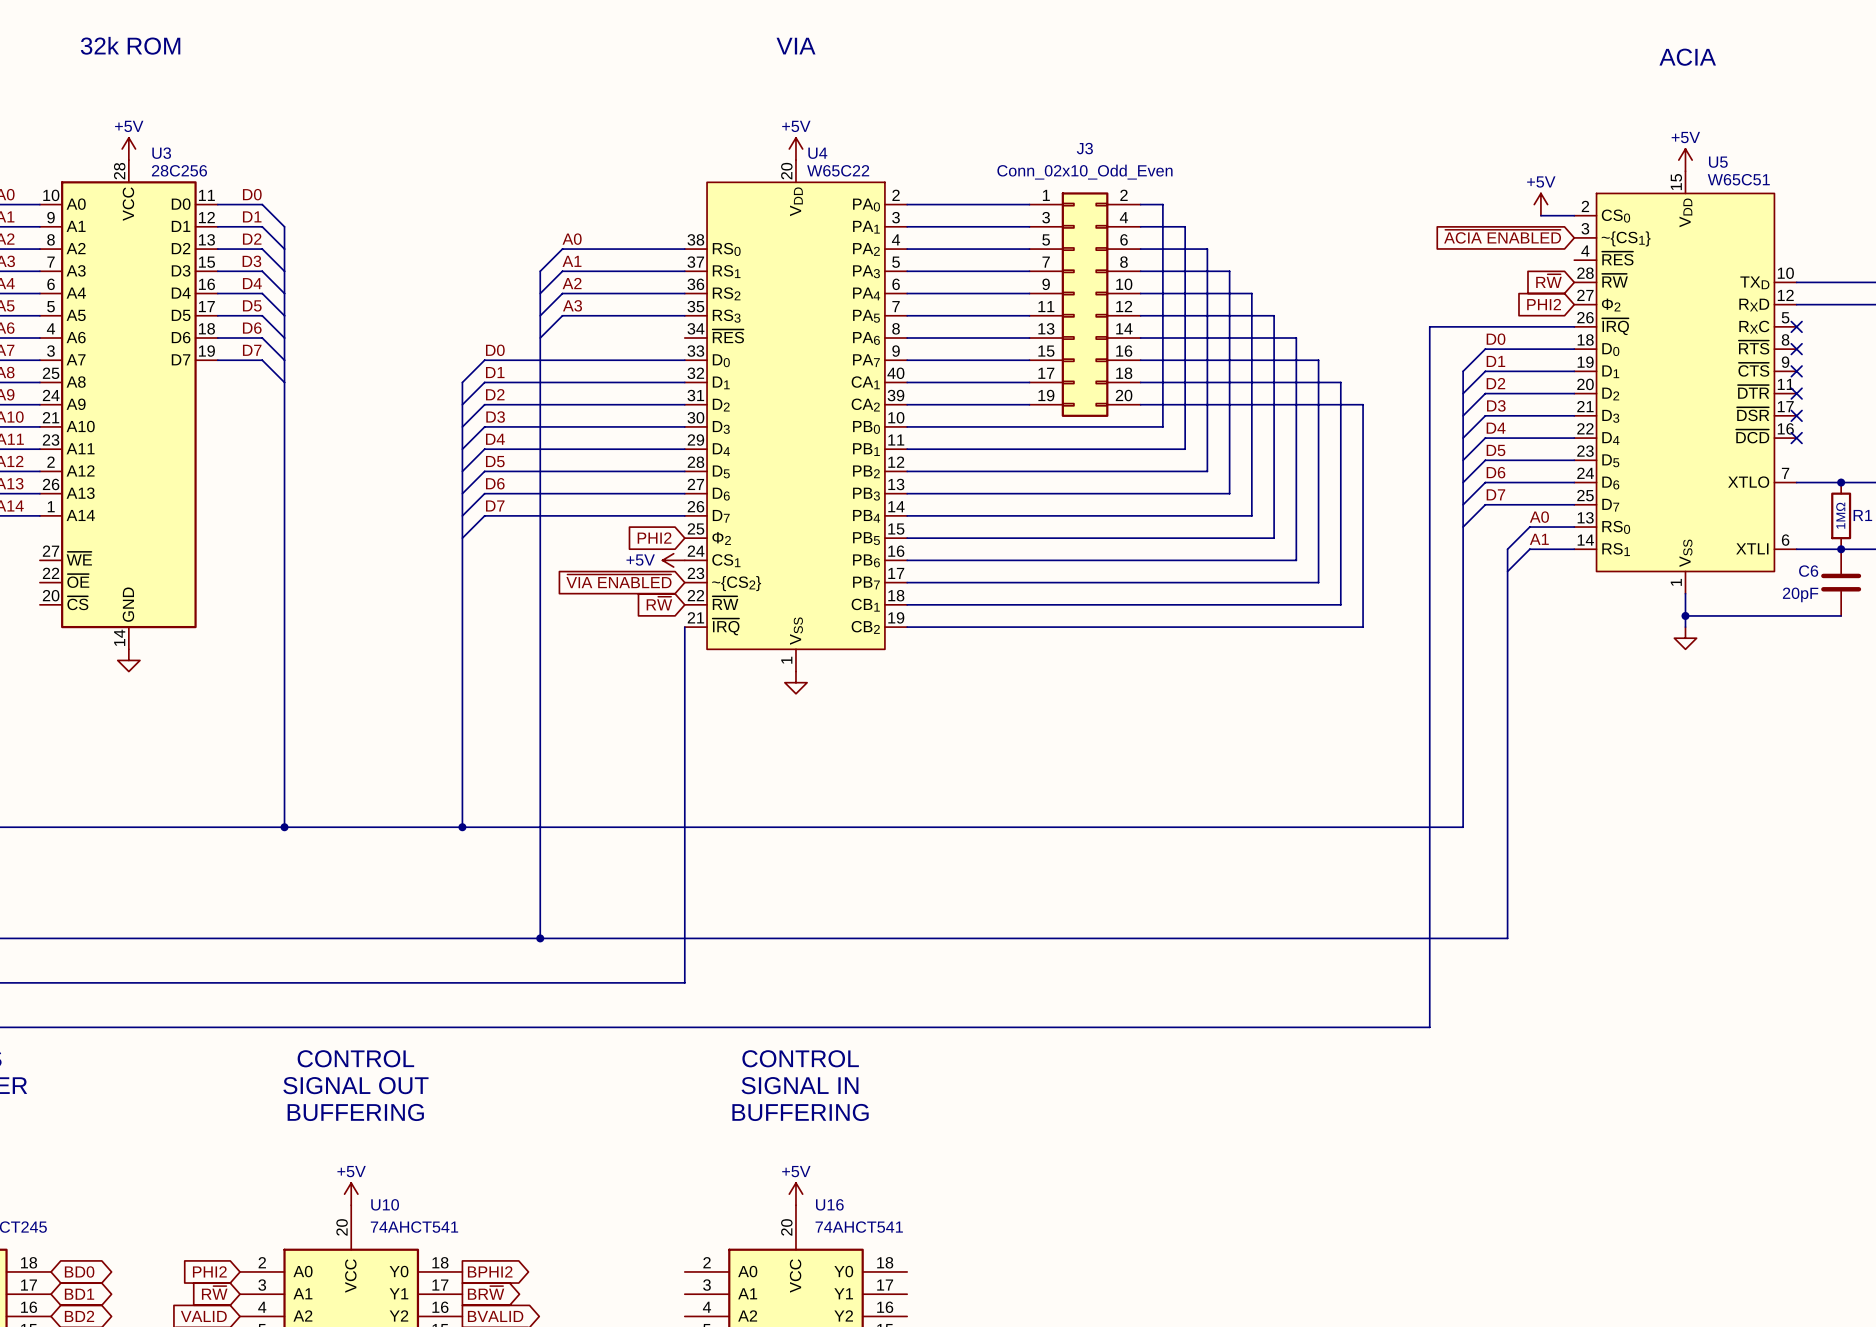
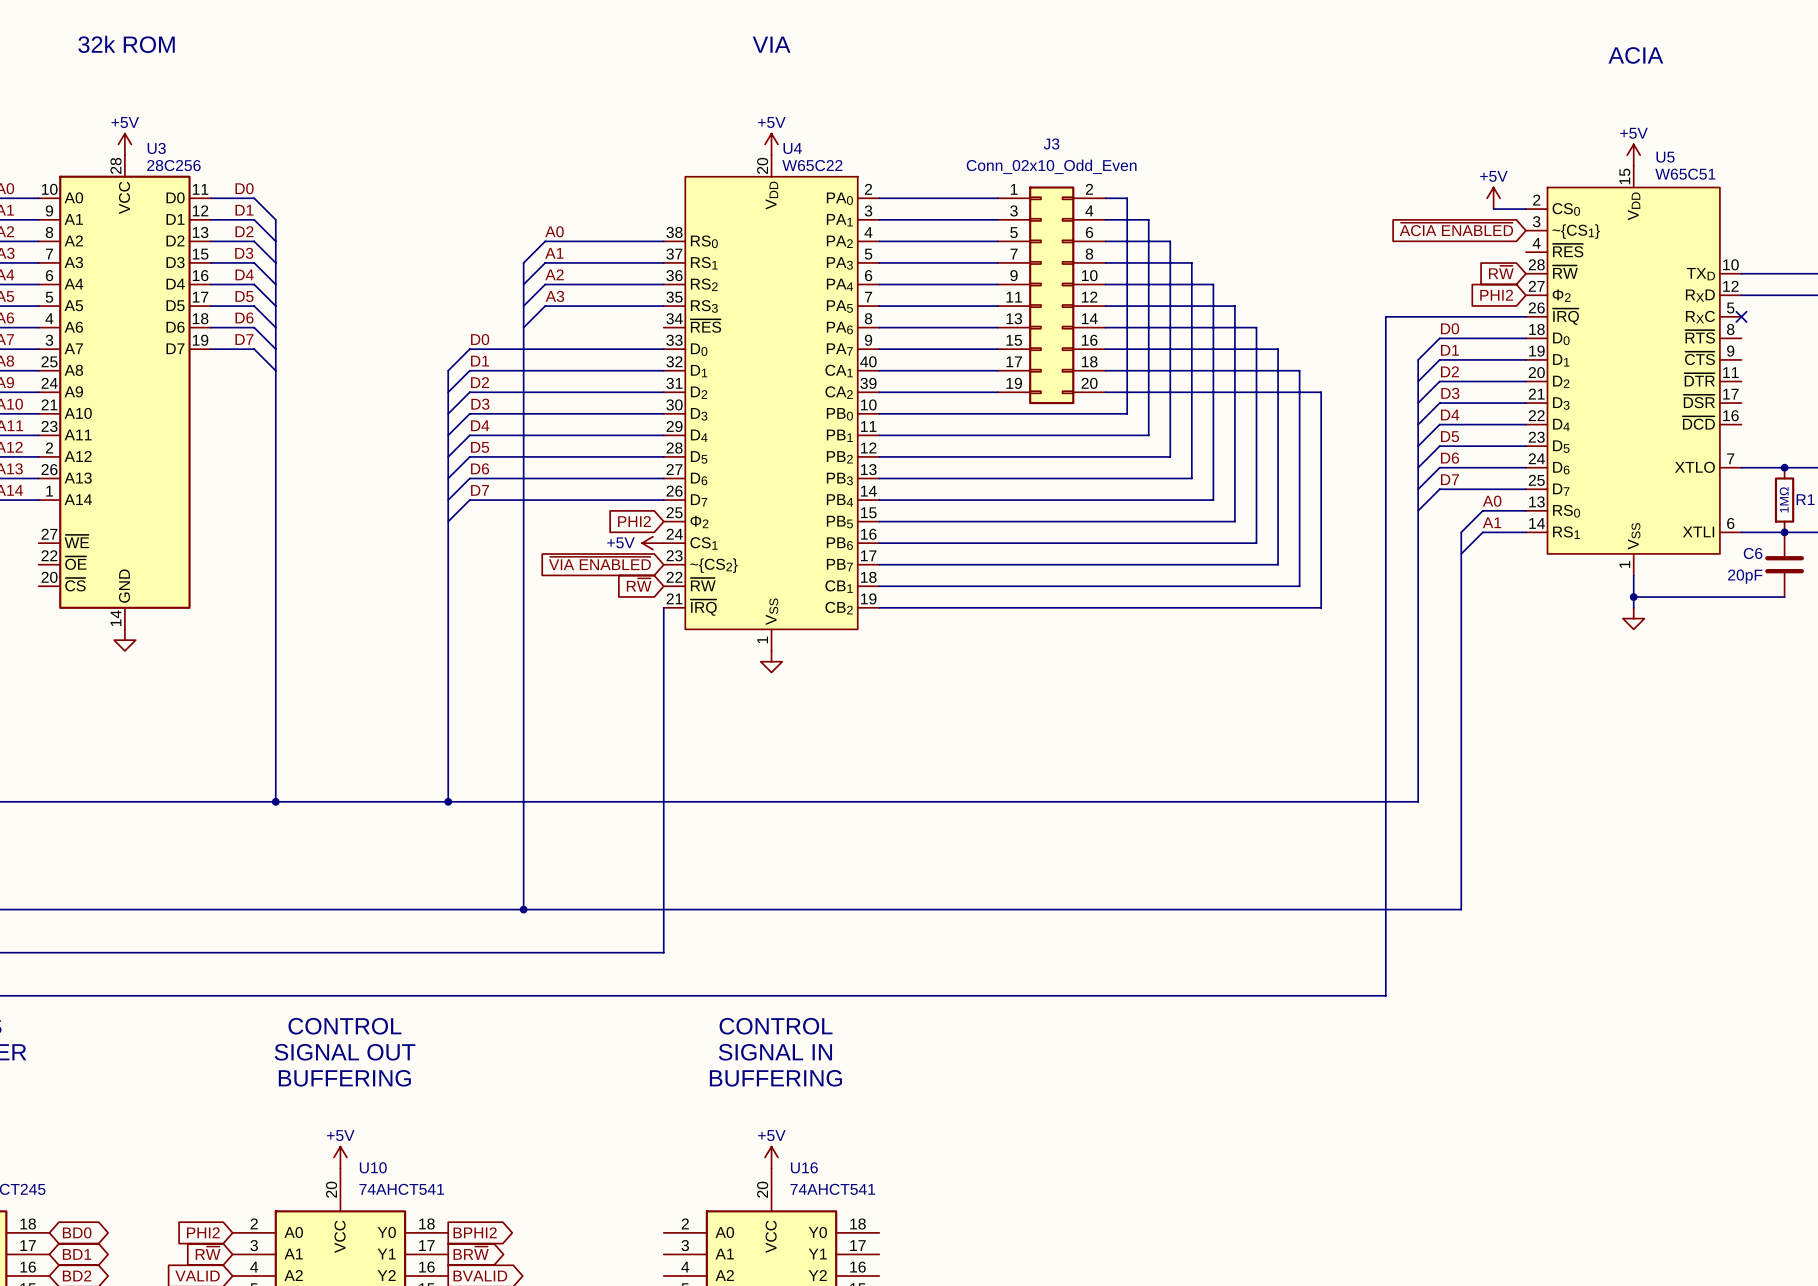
no-connect mark: (1796, 349) -> none
no-connect mark: (1796, 371) -> none
no-connect mark: (1796, 393) -> none
no-connect mark: (1796, 415) -> none
no-connect mark: (1796, 438) -> none

